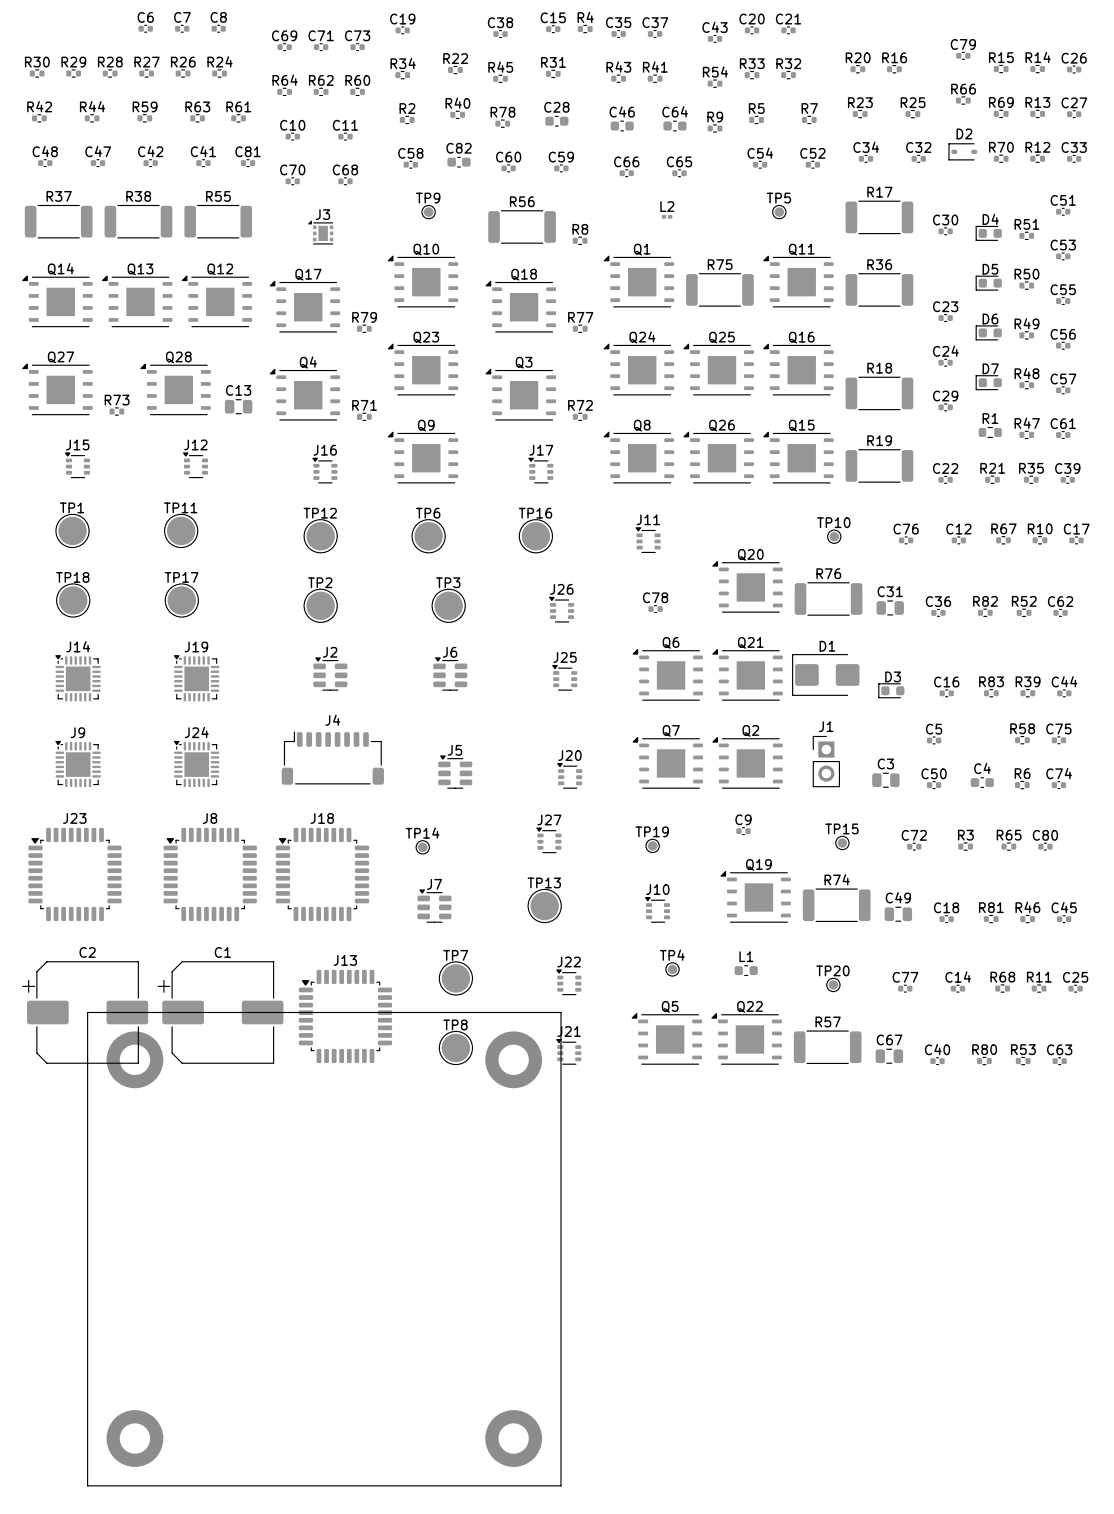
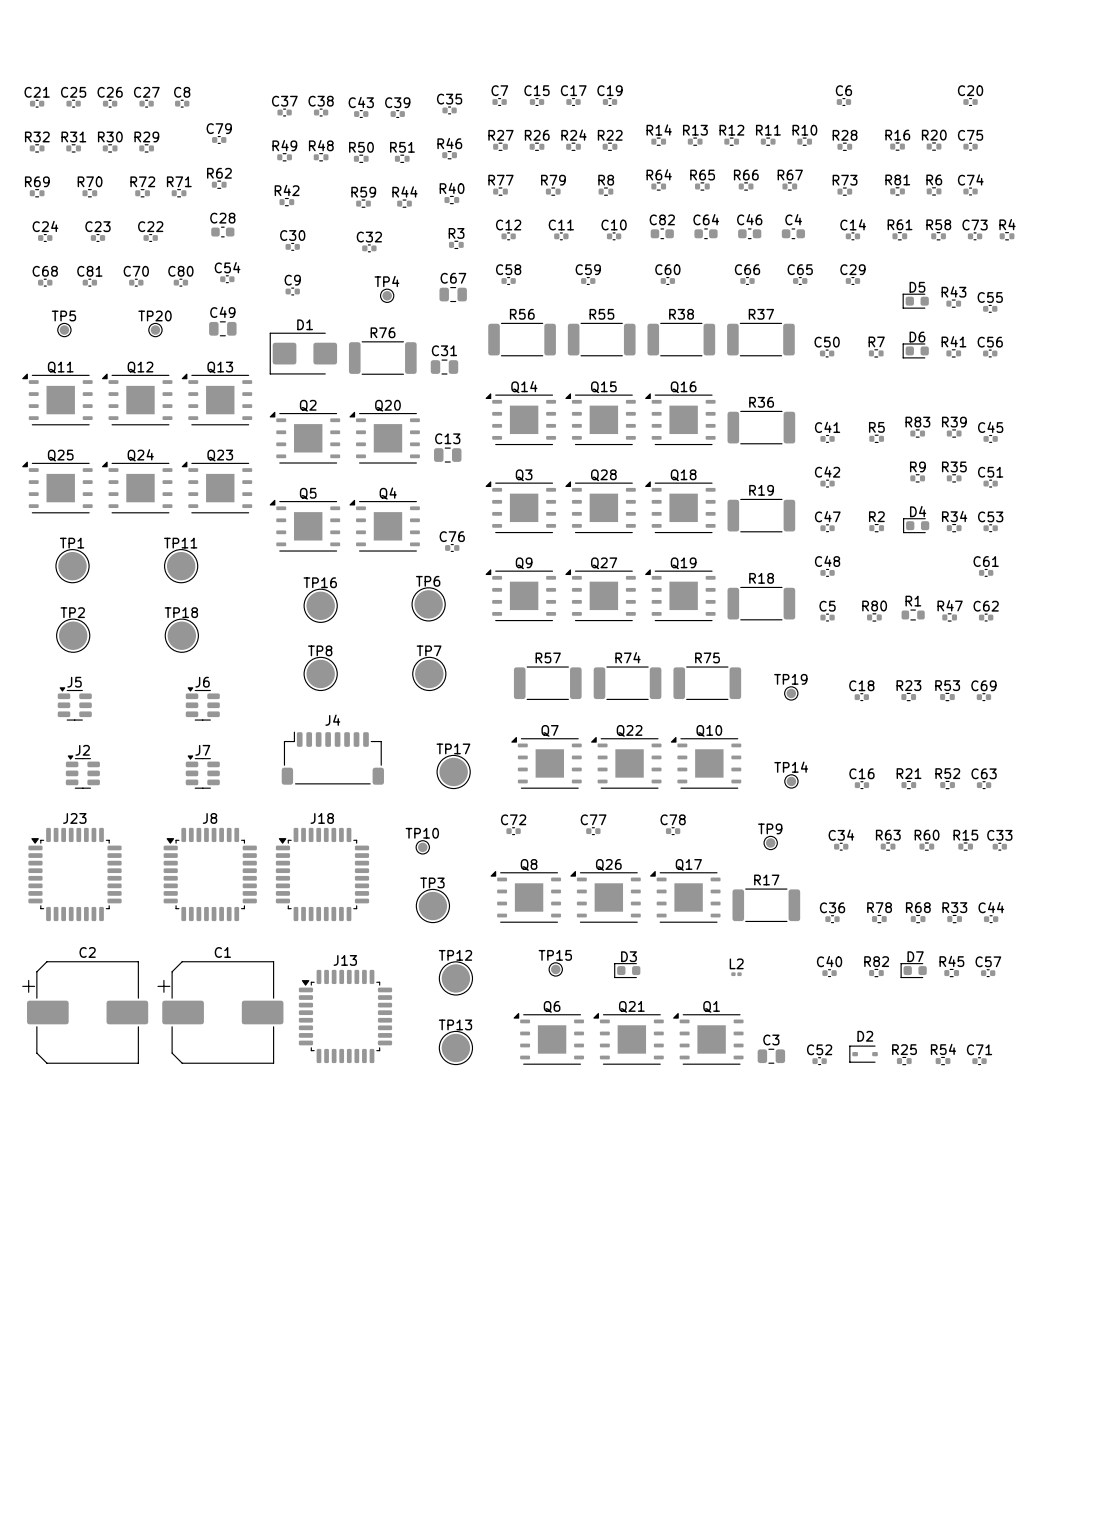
C6 position: (145, 28) -> (843, 102)
C7 position: (182, 28) -> (499, 102)
C8 position: (218, 28) -> (182, 103)
C15 position: (553, 29) -> (537, 102)
R4 position: (585, 29) -> (1007, 236)
C19 position: (402, 30) -> (609, 102)
C20 position: (752, 30) -> (970, 102)
C21 position: (788, 30) -> (37, 103)
C35 position: (618, 33) -> (449, 110)
C37 position: (655, 33) -> (284, 112)
C38 position: (500, 34) -> (321, 112)
C43 position: (715, 38) -> (361, 114)
C69 position: (284, 47) -> (983, 697)
C71 position: (321, 47) -> (979, 1061)
C73 position: (357, 47) -> (975, 236)
C79 position: (963, 55) -> (219, 139)
R20 position: (857, 69) -> (934, 146)
R16 position: (894, 69) -> (897, 146)
R15: (1001, 69) -> none
R14 position: (1037, 69) -> (658, 141)
C26 position: (1074, 69) -> (110, 103)
R22 position: (455, 70) -> (609, 146)
R30 position: (37, 73) -> (110, 148)
R29 position: (73, 73) -> (146, 148)
R28 position: (110, 73) -> (844, 146)
R27 position: (146, 73) -> (500, 146)
R26 position: (183, 73) -> (537, 146)
R24 position: (219, 73) -> (573, 146)
R31 position: (553, 73) -> (73, 148)
R34 position: (402, 75) -> (954, 528)
R33 position: (752, 75) -> (954, 919)
R32 position: (788, 75) -> (37, 148)
R45 position: (500, 78) -> (951, 973)
R43 position: (618, 78) -> (953, 303)
R41 position: (655, 78) -> (953, 353)
R54 position: (715, 83) -> (943, 1061)
R64 position: (284, 91) -> (658, 186)
R62 position: (321, 91) -> (219, 184)
R60 position: (357, 91) -> (926, 846)
R66 position: (963, 100) -> (746, 186)
R69 position: (1001, 113) -> (37, 193)
R13 position: (1037, 113) -> (695, 141)
R40 position: (457, 114) -> (451, 200)
R23 position: (860, 114) -> (908, 697)
R25 position: (912, 114) -> (904, 1061)
C27 position: (1074, 114) -> (146, 103)
R42 position: (39, 118) -> (286, 202)
R44 position: (92, 118) -> (404, 203)
R59 position: (144, 118) -> (363, 203)
R63 position: (197, 118) -> (888, 846)
R61 position: (238, 118) -> (899, 236)
R2 position: (407, 119) -> (876, 528)
R5 position: (756, 119) -> (876, 438)
R7 position: (809, 119) -> (876, 353)
C28 position: (556, 121) -> (222, 232)
R78 position: (502, 123) -> (879, 919)
C46 position: (622, 126) -> (749, 233)
C64 position: (674, 126) -> (706, 233)
R9 position: (715, 128) -> (917, 478)
C10 position: (292, 136) -> (614, 236)
C11 position: (345, 136) -> (561, 236)
D2 position: (962, 151) -> (863, 1054)
C34 position: (866, 158) -> (841, 846)
C32 position: (918, 158) -> (369, 248)
R70 position: (1001, 158) -> (89, 193)
R12 position: (1037, 158) -> (731, 141)
C33 position: (1074, 158) -> (999, 846)
C82 position: (459, 162) -> (662, 233)
C48 position: (45, 163) -> (827, 572)
C47 position: (97, 163) -> (827, 528)
C42 position: (150, 163) -> (827, 483)
C41 position: (203, 163) -> (827, 438)
C81 position: (248, 163) -> (89, 282)
C58 position: (410, 164) -> (508, 281)
C54 position: (760, 164) -> (227, 279)
C52 position: (812, 164) -> (819, 1061)
C60 position: (508, 168) -> (667, 281)
C59 position: (561, 168) -> (588, 281)
C66 position: (626, 173) -> (747, 281)
C65 position: (679, 173) -> (800, 281)
C70 position: (292, 181) -> (136, 282)
C68 position: (345, 181) -> (45, 282)
C51 position: (1063, 211) -> (990, 483)
TP9 position: (428, 212) -> (770, 842)
TP5 position: (779, 212) -> (64, 330)
L2 position: (667, 216) -> (736, 974)
R17 position: (879, 217) -> (766, 905)
R37 position: (58, 221) -> (760, 339)
R38 position: (138, 221) -> (681, 339)
R55 position: (218, 221) -> (601, 339)
R56 position: (522, 226) -> (522, 339)
C30 position: (945, 231) -> (292, 246)
J3: (320, 232) -> none
D4 position: (988, 233) -> (916, 525)
R51 position: (1026, 235) -> (402, 158)
R8 position: (580, 240) -> (605, 191)
R3: none -> (456, 244)
C53 position: (1063, 256) -> (990, 528)
Q10 position: (423, 281) -> (706, 762)
Q1 position: (638, 281) -> (708, 1038)
Q11 position: (798, 281) -> (57, 399)
D5 position: (988, 283) -> (915, 301)
R50 position: (1026, 285) -> (361, 158)
R75 position: (719, 289) -> (707, 683)
R36 position: (879, 289) -> (761, 427)
Q14 position: (57, 301) -> (520, 419)
Q13 position: (137, 301) -> (216, 399)
Q12 position: (216, 301) -> (137, 399)
C55 position: (1063, 301) -> (990, 308)
Q17 position: (304, 306) -> (685, 896)
Q18 position: (520, 306) -> (680, 507)
C23 position: (945, 318) -> (97, 237)
R79 position: (364, 328) -> (553, 191)
R77 position: (580, 328) -> (500, 191)
D6 position: (988, 332) -> (915, 350)
R49 position: (1026, 335) -> (284, 157)
C56 position: (1063, 345) -> (990, 353)
C24 position: (945, 362) -> (45, 237)
Q23 position: (423, 369) -> (216, 487)
Q24 position: (638, 369) -> (137, 487)
Q25 position: (718, 369) -> (57, 487)
Q16 position: (798, 369) -> (680, 419)
D7 position: (988, 382) -> (913, 970)
R48 position: (1026, 385) -> (321, 157)
Q27 position: (57, 389) -> (600, 595)
Q28 position: (175, 389) -> (600, 507)
C57 position: (1063, 390) -> (988, 973)
R18 position: (879, 393) -> (761, 603)
Q4 position: (304, 394) -> (384, 525)
Q3 position: (520, 394) -> (520, 507)
C13 position: (238, 406) -> (447, 455)
C29 position: (945, 407) -> (852, 281)
R73 position: (116, 411) -> (844, 191)
R71 position: (364, 416) -> (179, 193)
R72 position: (580, 416) -> (142, 193)
R1 position: (990, 432) -> (913, 614)
R47 position: (1026, 434) -> (949, 617)
C61 position: (1063, 435) -> (986, 572)
Q9 position: (423, 457) -> (520, 595)
Q8 position: (638, 457) -> (525, 896)
Q26 position: (718, 457) -> (605, 896)
Q15 position: (798, 457) -> (600, 419)
J15: (77, 465) -> none
J12: (195, 465) -> none
R19 position: (879, 465) -> (761, 515)
J16: (324, 470) -> none
J17: (540, 470) -> none
C22 position: (945, 479) -> (150, 237)
R21 position: (992, 479) -> (908, 785)
R35 position: (1031, 479) -> (954, 478)
C39 position: (1067, 479) -> (397, 114)
TP1 position: (72, 530) -> (72, 566)
TP11 position: (181, 530) -> (181, 566)
TP12: (320, 536) -> none
TP6 position: (428, 536) -> (428, 604)
TP16: (535, 536) -> none
TP10: (834, 536) -> none
J11: (648, 540) -> none
C76 position: (906, 540) -> (452, 547)
C12 position: (958, 540) -> (508, 236)
R67 position: (1003, 540) -> (789, 186)
R10 position: (1039, 540) -> (804, 141)
C17 position: (1076, 540) -> (573, 102)
TP2 name: TP2 (320, 582) -> TP16 (320, 582)
Q20 position: (747, 586) -> (384, 437)
R76 position: (828, 598) -> (382, 358)
TP18 position: (73, 600) -> (181, 635)
TP17 position: (181, 600) -> (453, 771)
TP3 position: (448, 605) -> (432, 906)
C31 position: (890, 607) -> (444, 367)
J26: (561, 609) -> none
C78 position: (655, 609) -> (673, 831)
C36 position: (938, 612) -> (832, 919)
R82 position: (985, 612) -> (876, 973)
R52 position: (1024, 612) -> (947, 785)
C62 position: (1060, 612) -> (986, 617)
TP2: none -> (73, 635)
TP8: none -> (320, 673)
TP7: none -> (429, 673)
J2 position: (330, 674) -> (82, 772)
J6 position: (450, 674) -> (202, 703)
Q6 position: (667, 674) -> (548, 1038)
Q21 position: (747, 674) -> (628, 1038)
D1 position: (825, 674) -> (303, 353)
J25: (564, 677) -> none
J14: (77, 678) -> none
J19: (196, 678) -> none
D3 position: (891, 690) -> (627, 970)
C16 position: (946, 693) -> (861, 785)
R83 position: (991, 693) -> (917, 433)
R39 position: (1027, 693) -> (954, 433)
C44 position: (1064, 693) -> (991, 919)
C5 position: (934, 740) -> (827, 617)
R58 position: (1022, 740) -> (938, 236)
C75 position: (1058, 740) -> (970, 146)
J1: (826, 761) -> none
Q7 position: (667, 762) -> (546, 762)
Q2 position: (747, 762) -> (304, 437)
J9: (77, 764) -> none
J24: (196, 764) -> none
J5 position: (455, 772) -> (74, 703)
J20: (569, 775) -> none
C3 position: (885, 780) -> (771, 1056)
TP14: none -> (791, 781)
C4 position: (982, 782) -> (793, 233)
C50 position: (934, 785) -> (827, 353)
R6 position: (1022, 785) -> (934, 191)
C74 position: (1058, 785) -> (970, 191)
C9 position: (743, 831) -> (292, 291)
TP14 name: TP14 (422, 833) -> TP10 (422, 833)
R3 name: R3 (965, 835) -> R15 (965, 835)
J27: (548, 840) -> none
TP15 position: (842, 842) -> (555, 969)
TP19 position: (652, 845) -> (791, 693)
C72 position: (914, 846) -> (513, 831)
R65 position: (1008, 846) -> (702, 186)
C80 position: (1045, 846) -> (180, 282)
Q19 position: (755, 896) -> (680, 595)
R74 position: (836, 905) -> (627, 683)
J7 position: (434, 906) -> (202, 772)
TP13: (544, 906) -> none
J10: (657, 909) -> none
C49 position: (898, 914) -> (222, 328)
C18 position: (946, 919) -> (861, 697)
R81 position: (991, 919) -> (897, 191)
R46 position: (1027, 919) -> (449, 155)
C45 position: (1064, 919) -> (990, 438)
TP7 name: TP7 (455, 955) -> TP12 (455, 955)
TP4 position: (672, 969) -> (387, 295)
L1: (746, 970) -> none
J22: (568, 982) -> none
TP20 position: (833, 984) -> (155, 330)
C77 position: (905, 988) -> (593, 831)
C14 position: (957, 988) -> (852, 236)
R68 position: (1002, 988) -> (918, 919)
R11 position: (1039, 988) -> (768, 141)
C25 position: (1075, 988) -> (73, 103)
board edge: (87, 1012) (560, 1012) (560, 1485) (87, 1485) (87, 1012) -> none
TP8 name: TP8 (455, 1024) -> TP13 (455, 1024)
Q5 position: (666, 1038) -> (304, 525)
Q22 position: (746, 1038) -> (626, 762)
R57 position: (827, 1047) -> (547, 683)
J21: (568, 1051) -> none
C67 position: (889, 1056) -> (453, 294)
part: (134, 1059) -> none
part: (513, 1059) -> none
C40 position: (937, 1061) -> (829, 973)
R80 position: (984, 1061) -> (874, 617)
R53 position: (1023, 1061) -> (947, 697)
C63 position: (1059, 1061) -> (984, 785)
part: (134, 1438) -> none
part: (513, 1438) -> none

